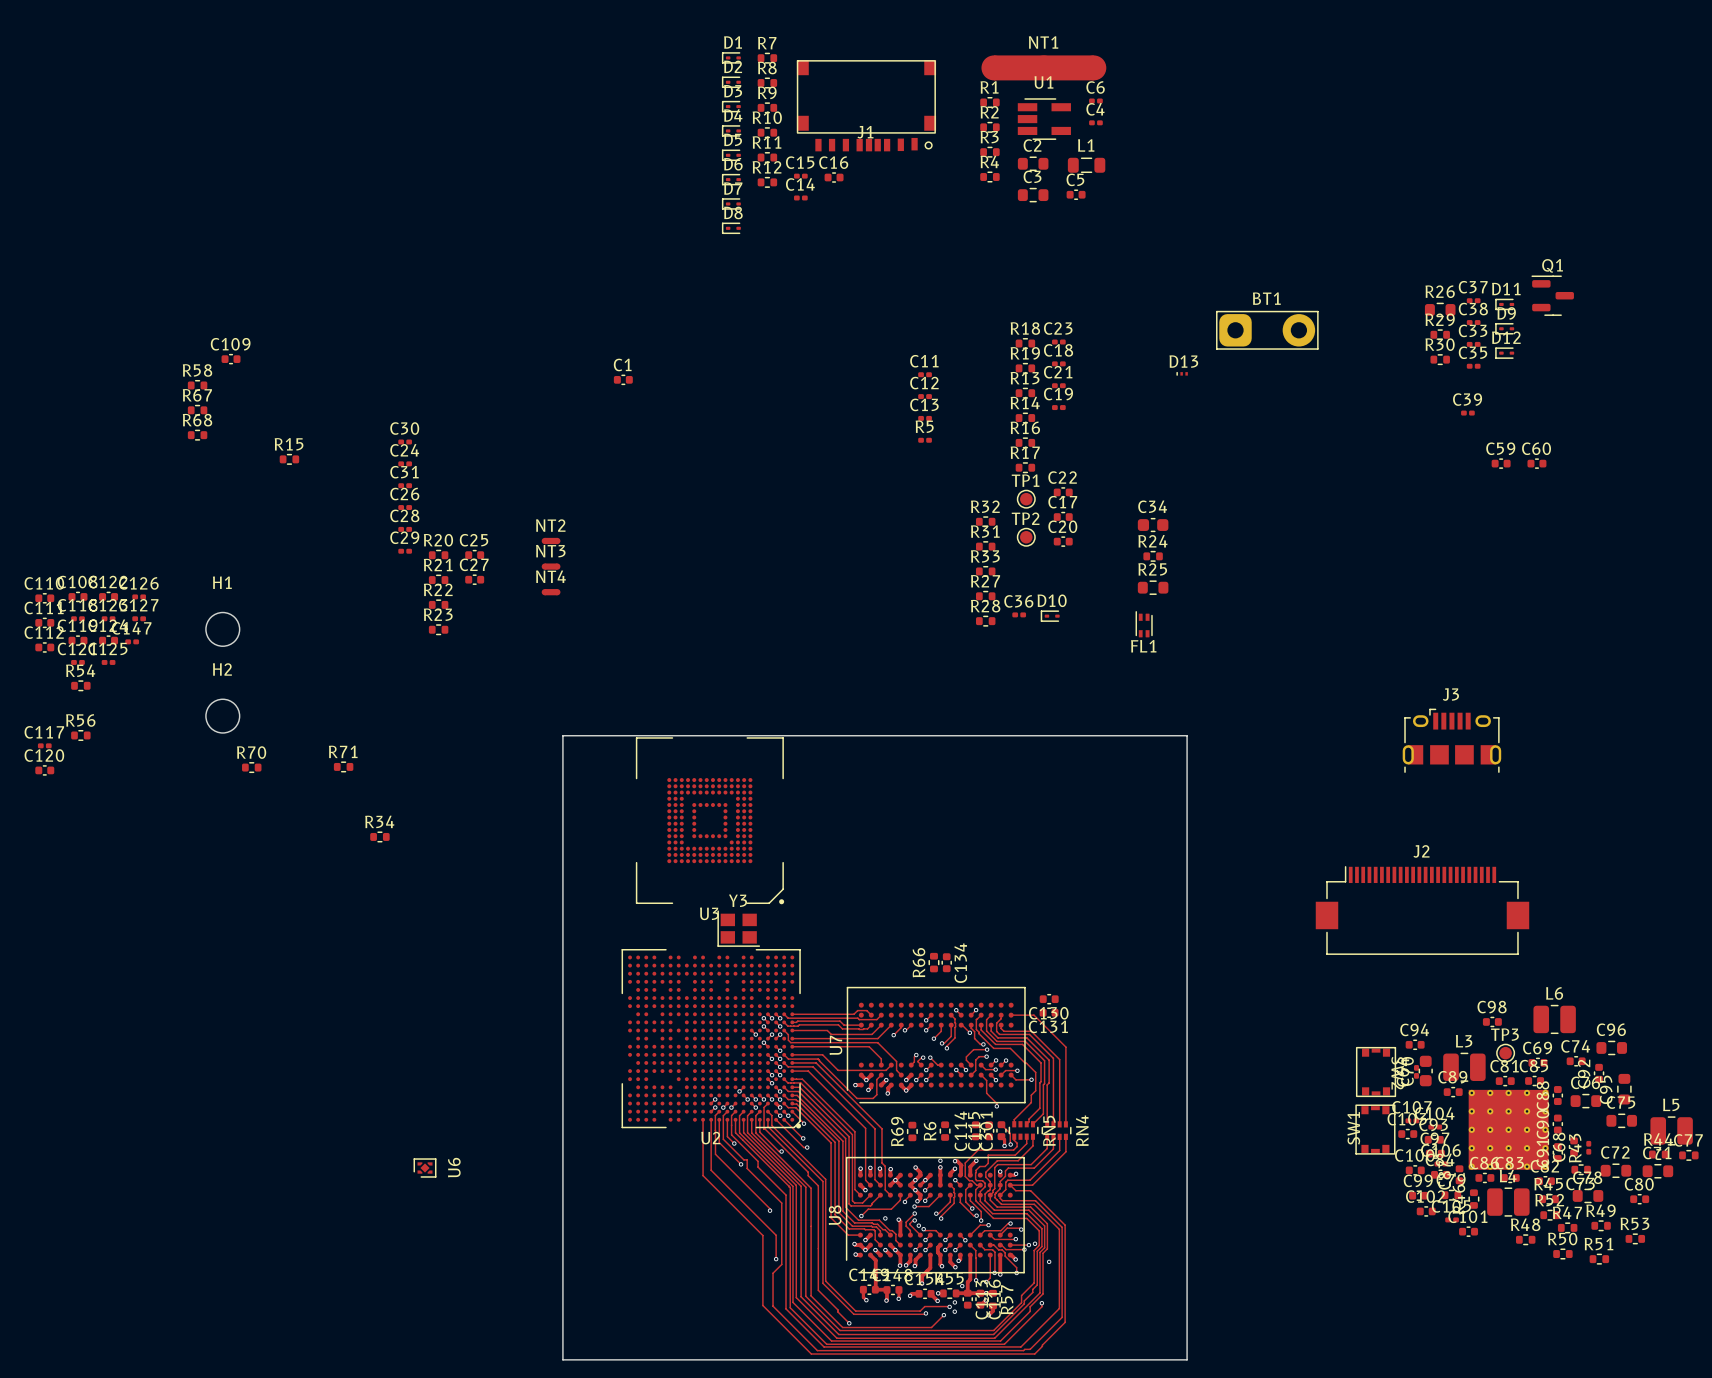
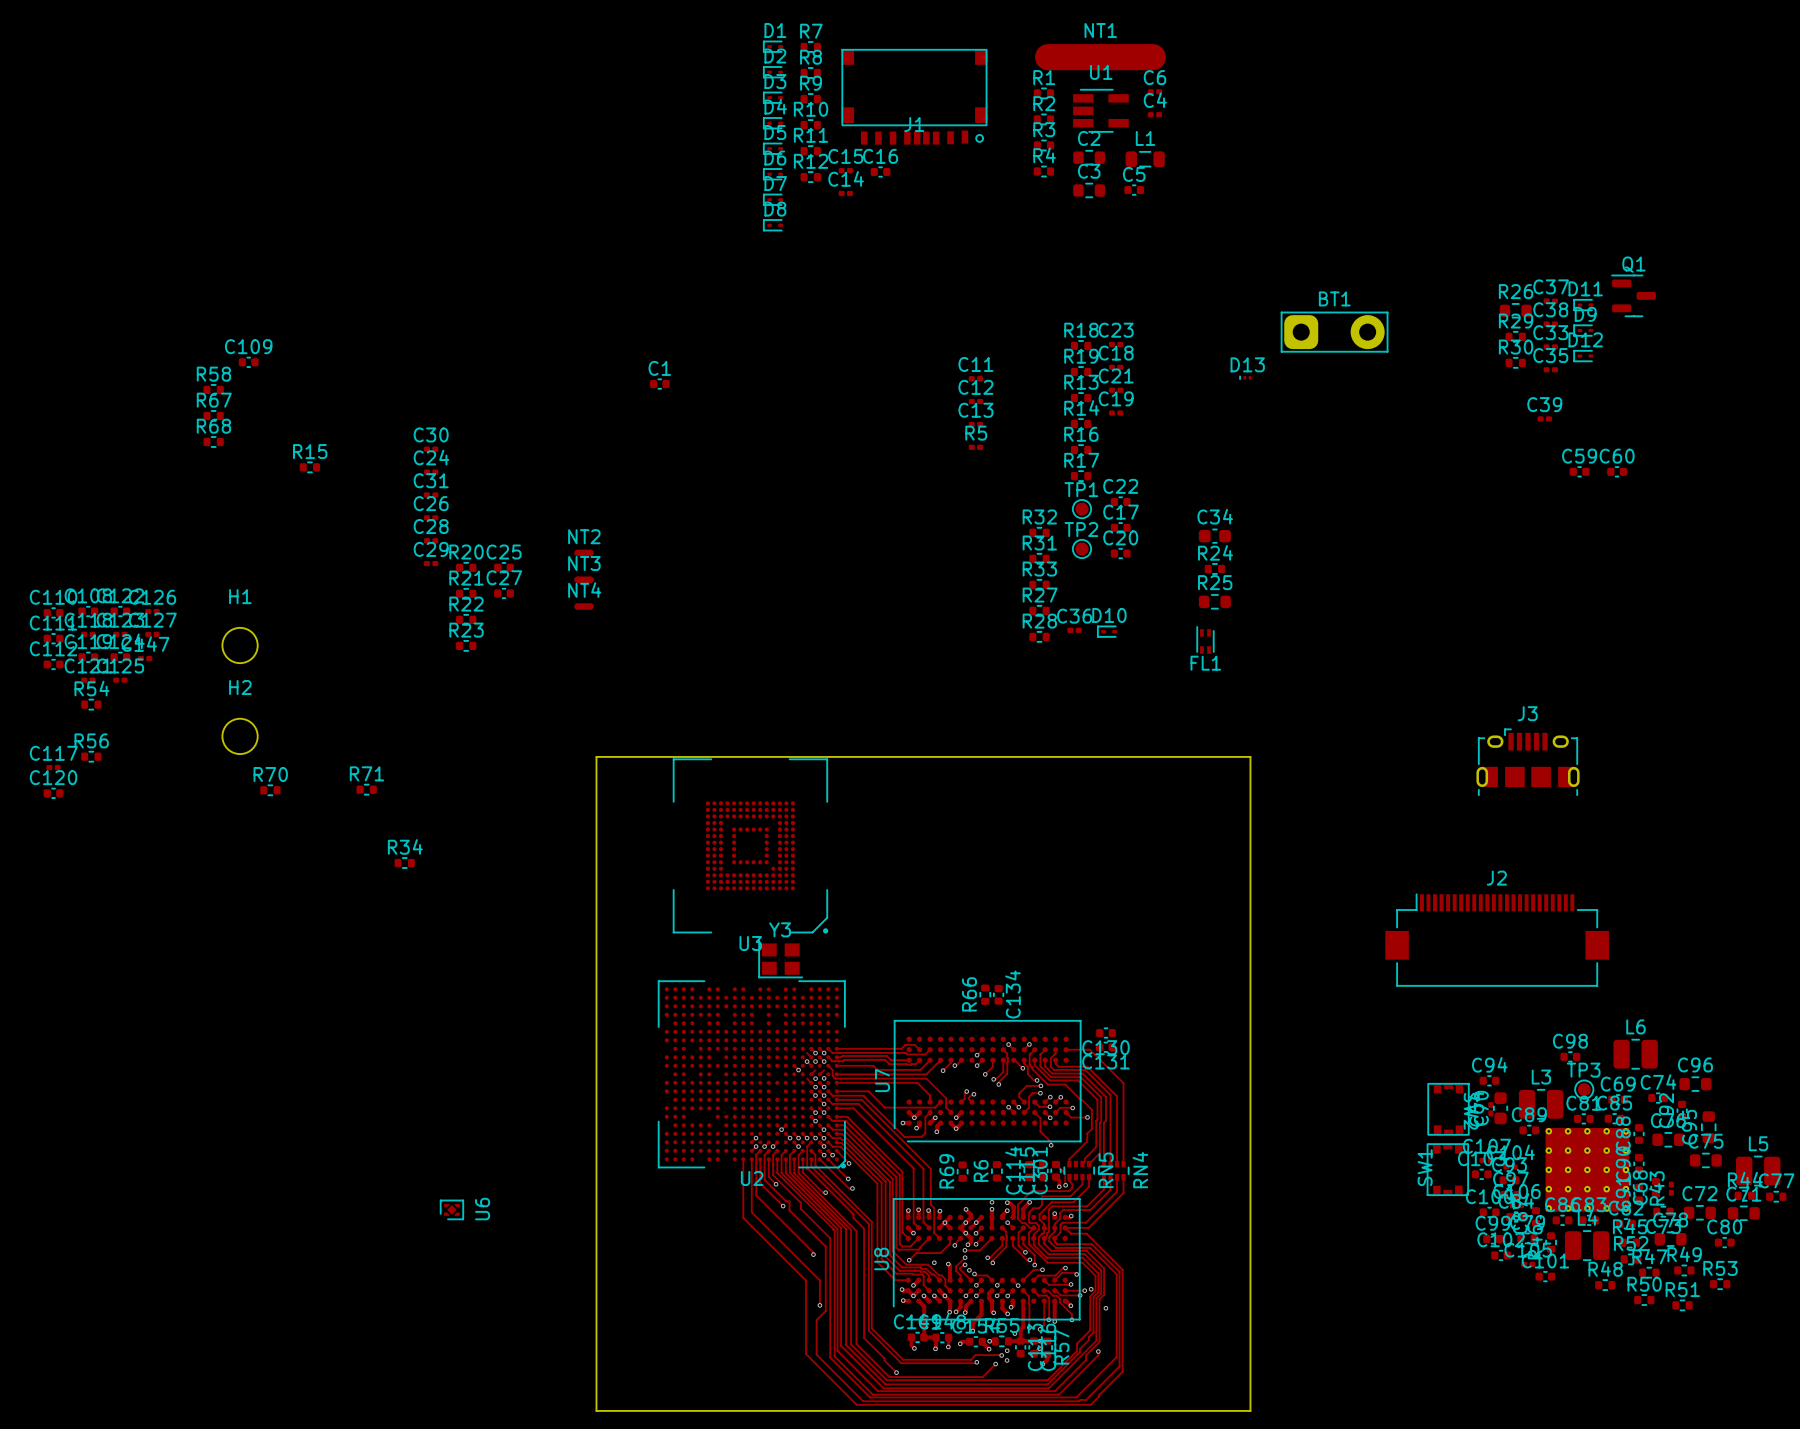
via: (763, 1018) -> none
via: none -> (815, 1061)
via: (772, 1034) -> none
via: (780, 1034) -> none
via: (763, 1042) -> none
via: none -> (815, 1078)
via: none -> (824, 1078)
via: none -> (815, 1087)
track: (930, 1057) (937, 1065) (941, 1065) -> none
via: (930, 1057) -> none
track: (931, 1065) (926, 1070) -> none
via: (926, 1070) -> none
track: (921, 1075) (916, 1080) -> none
track: (931, 1075) (926, 1080) -> none
via: (916, 1080) -> none
via: (926, 1080) -> none

